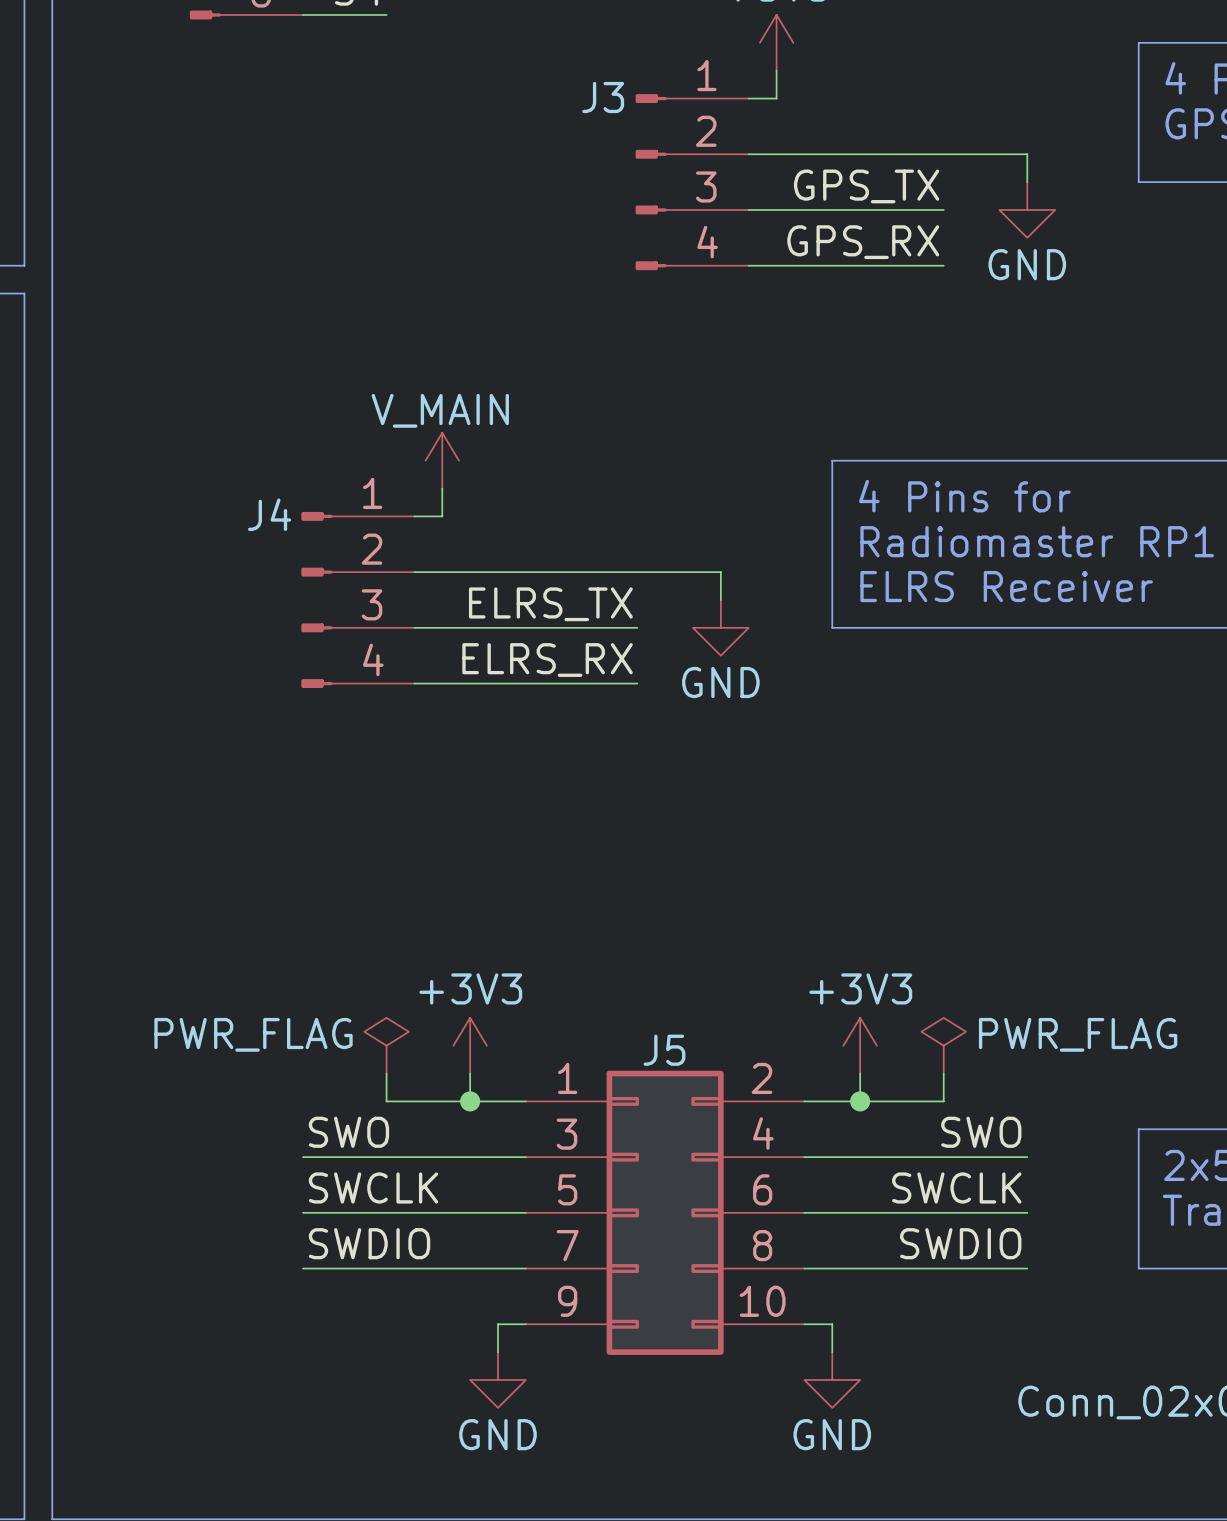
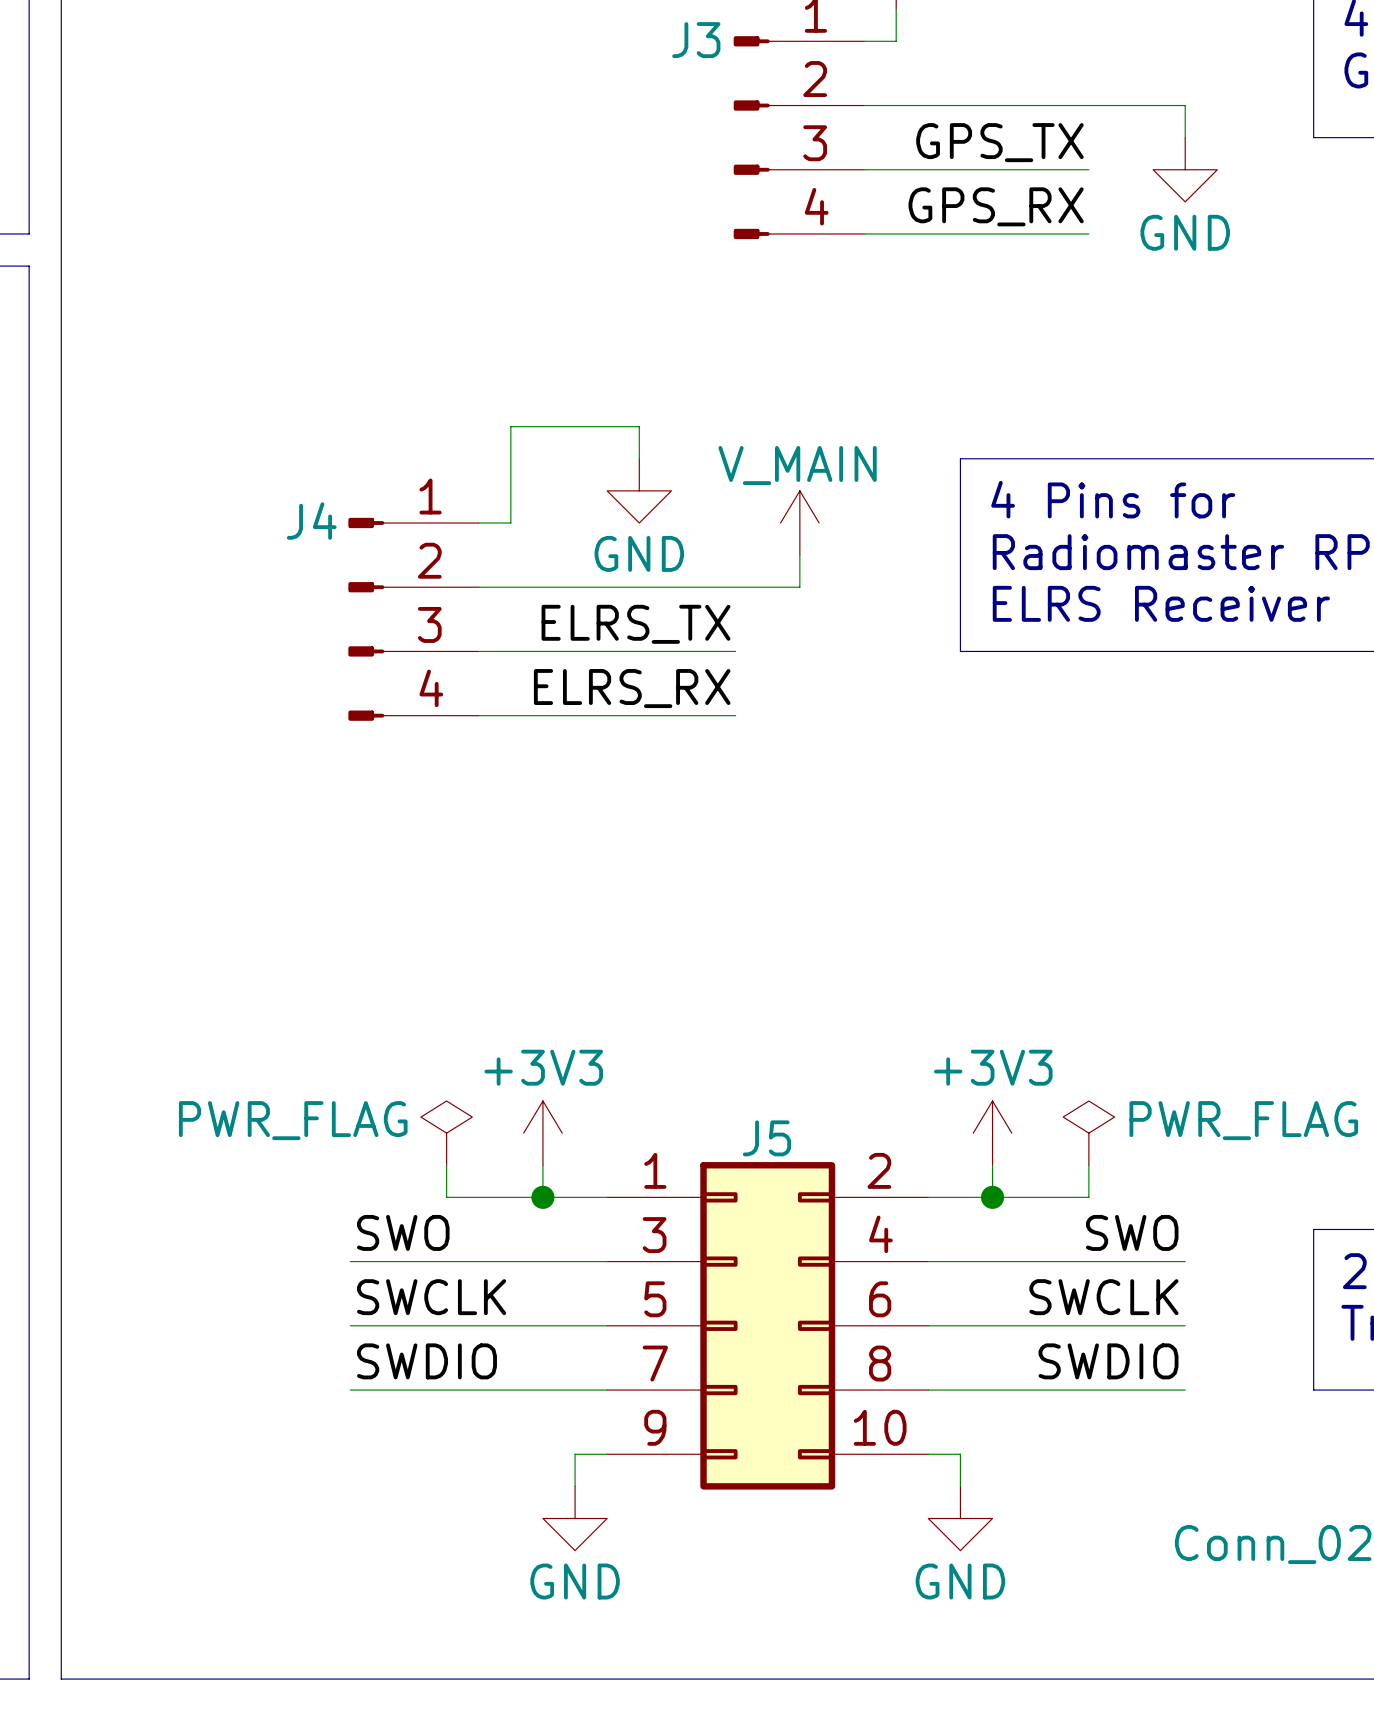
power symbol position: V_MAIN (442, 460) -> V_MAIN (799, 522)
wire: none -> (639, 458) (639, 426) (510, 426) (510, 490)
wire: (693, 572) (720, 572) (720, 599) -> (799, 587) (799, 555)
power symbol position: GND (720, 627) -> GND (639, 490)

